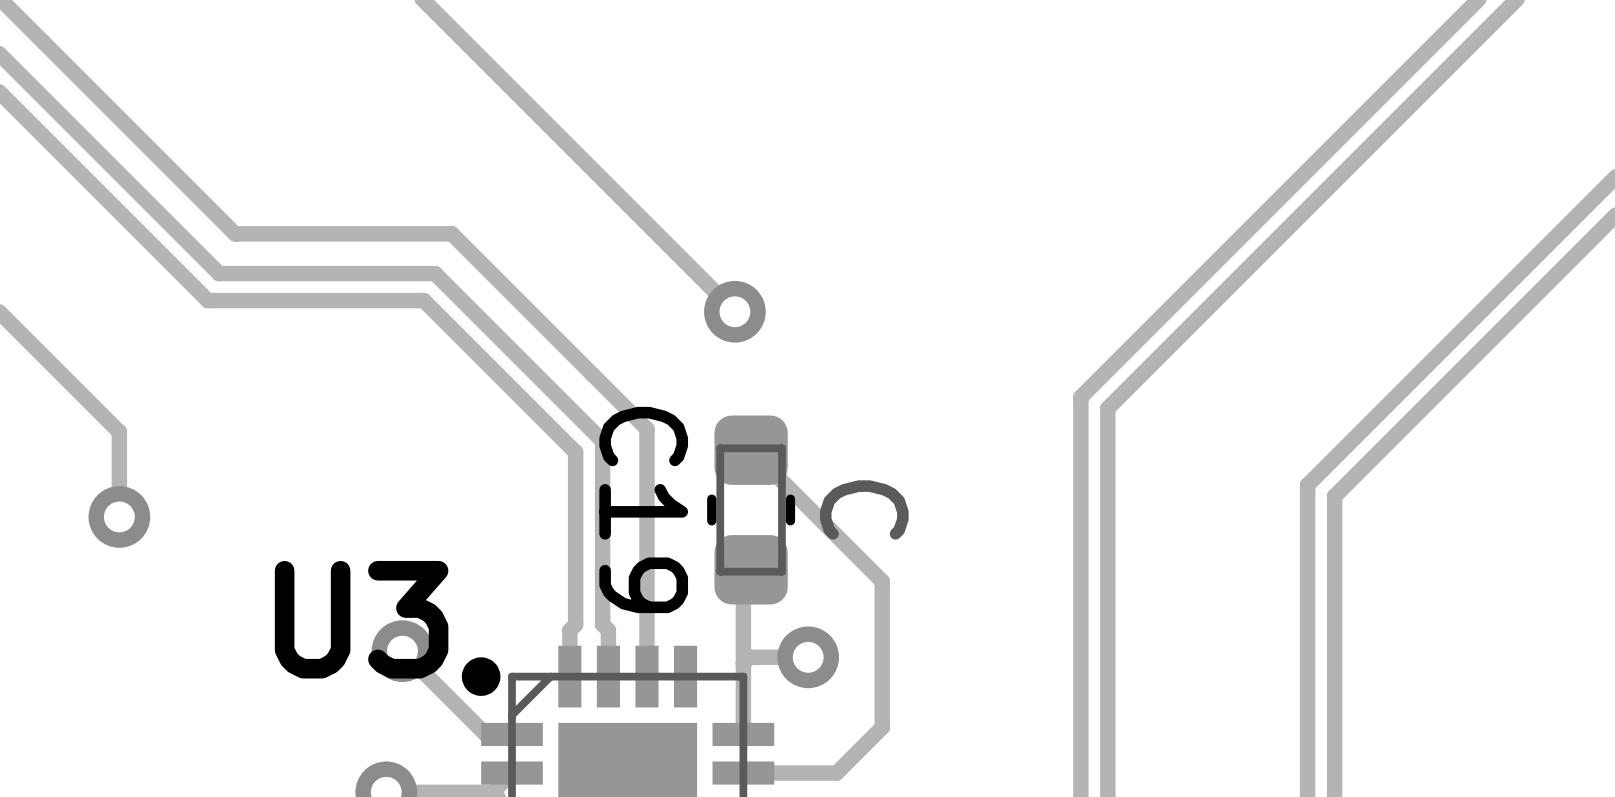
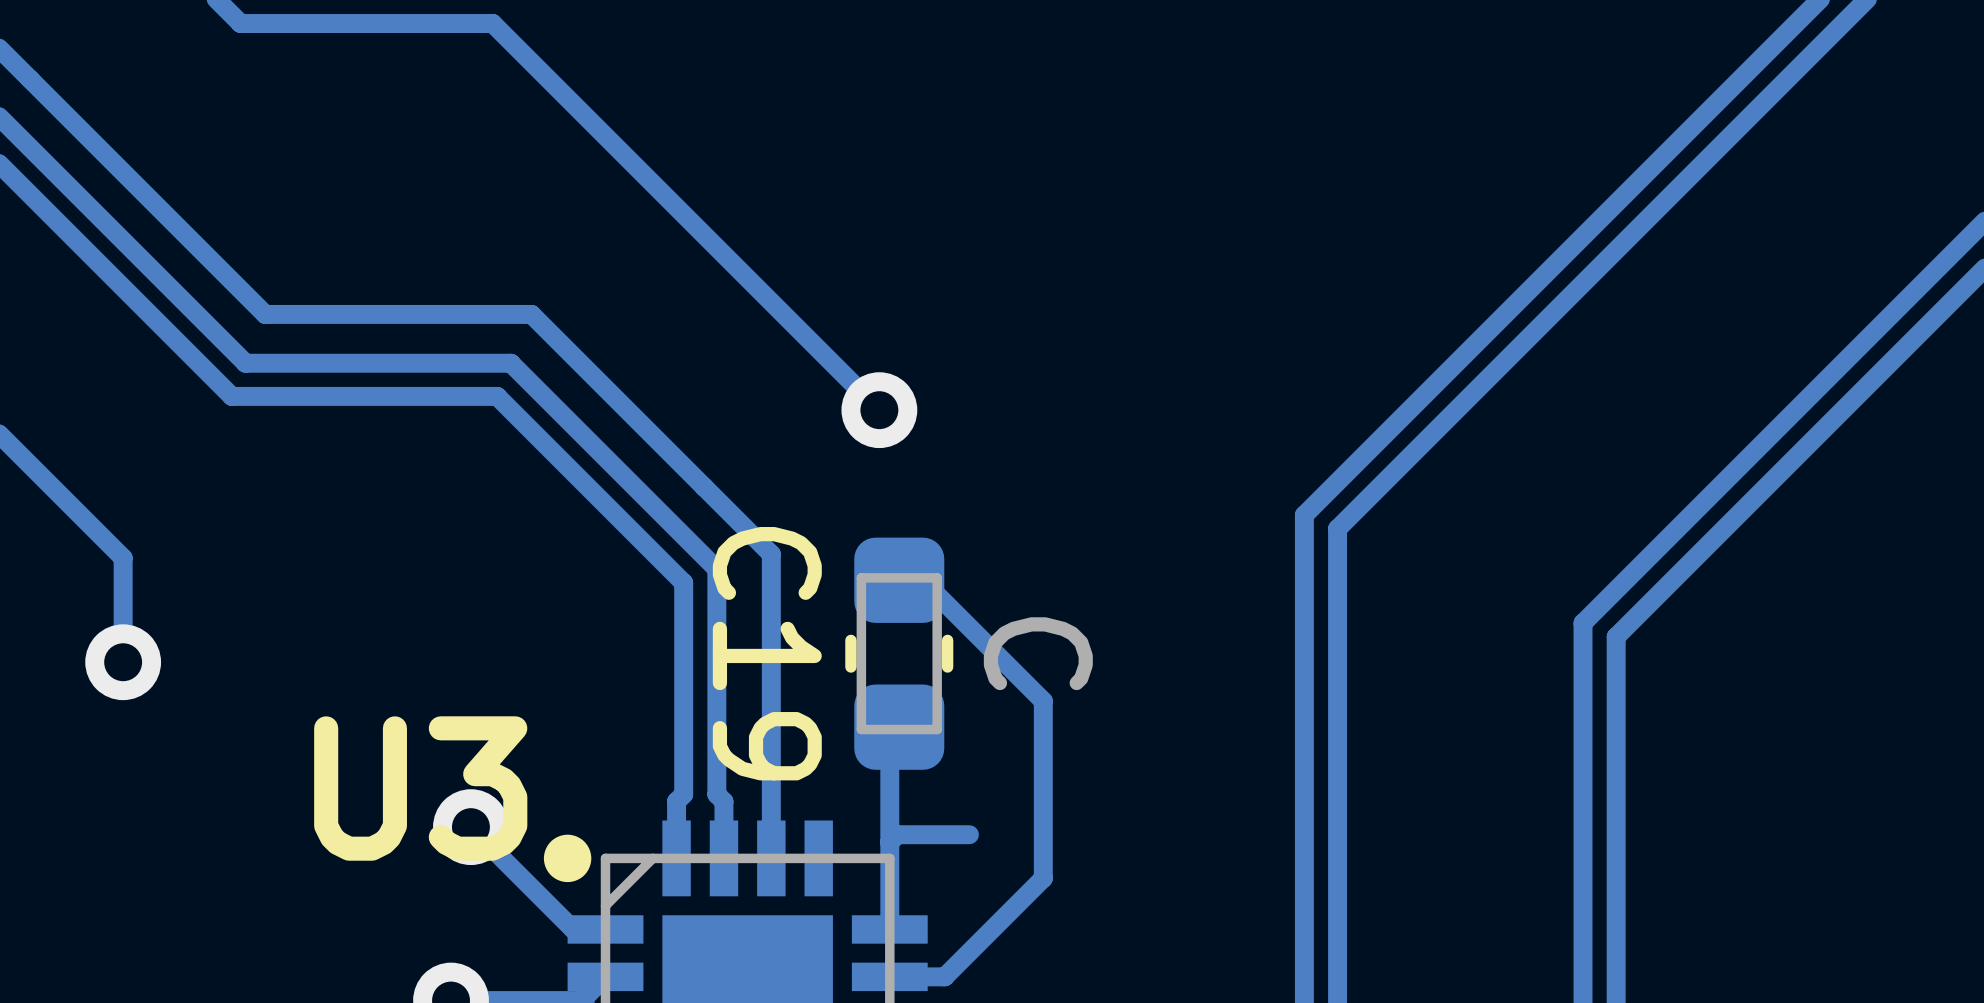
track: (751, 450) (882, 581) (882, 727) (836, 773) (788, 773) -> (899, 580) (922, 580) (1043, 701) (1043, 878) (944, 976)
via: (808, 657) -> none

